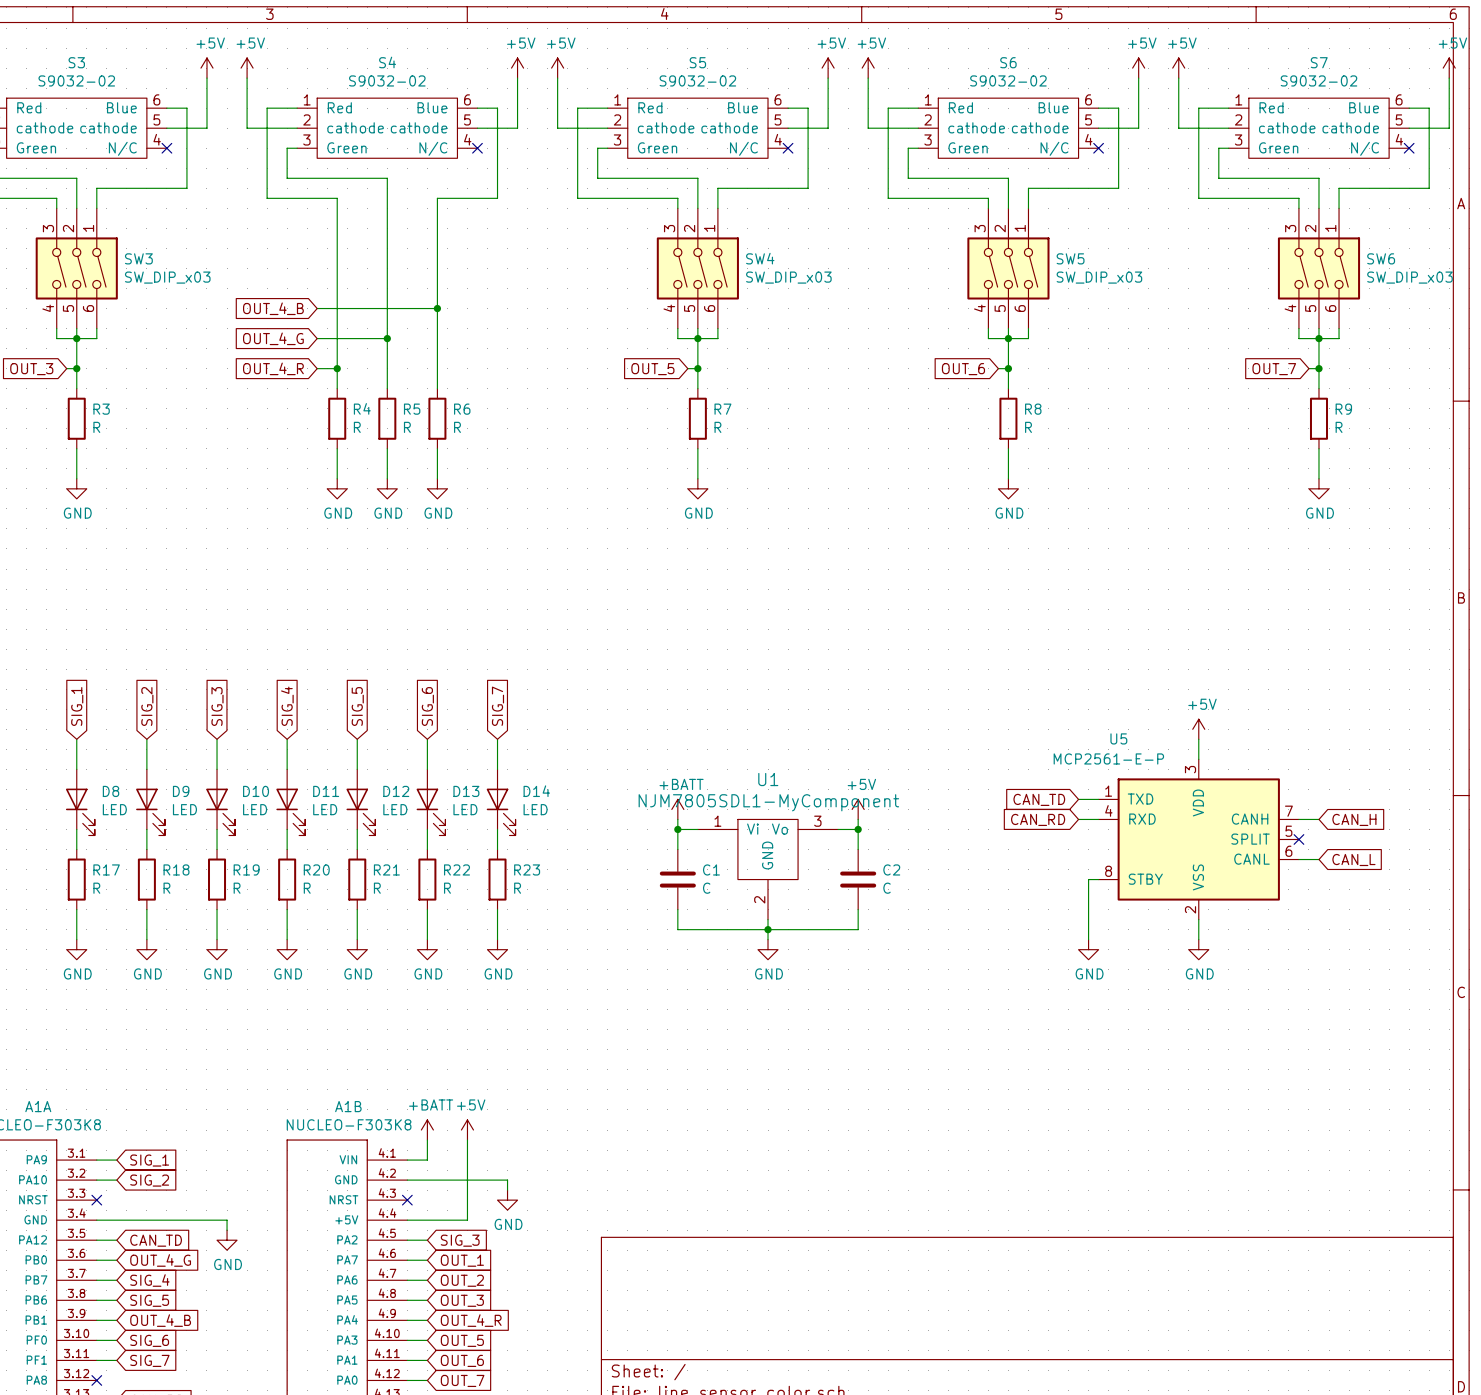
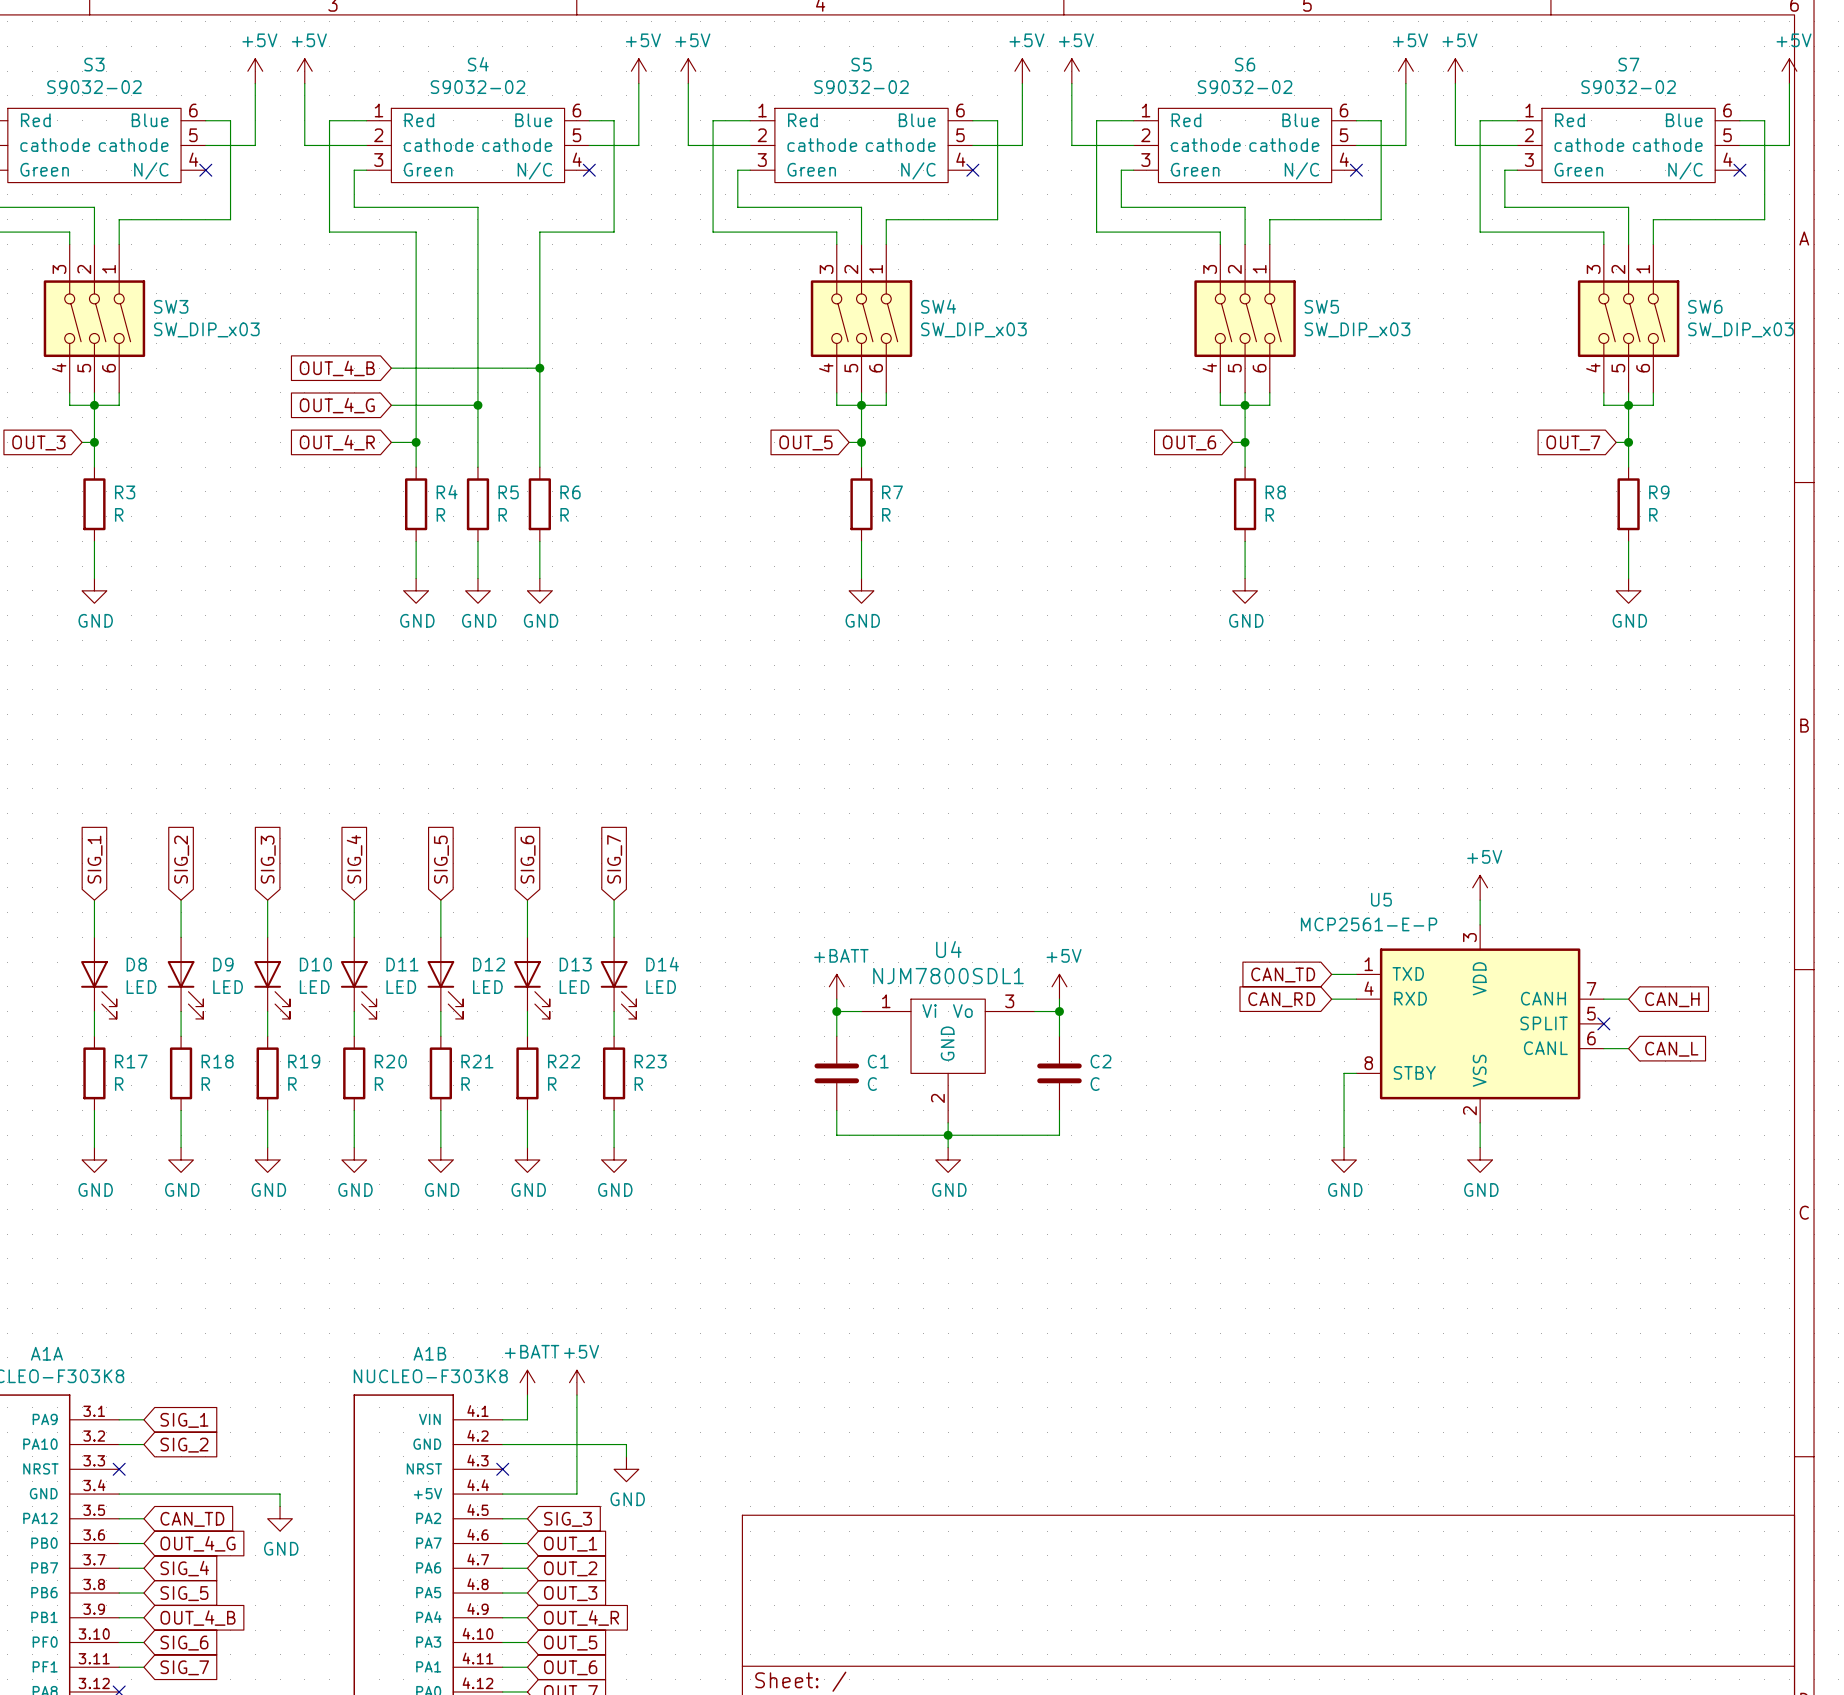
U1 name: U1 (768, 779) -> U4 (948, 949)
U1 value: NJM7805SDL1-MyComponent (768, 802) -> NJM7800SDL1 (948, 976)

